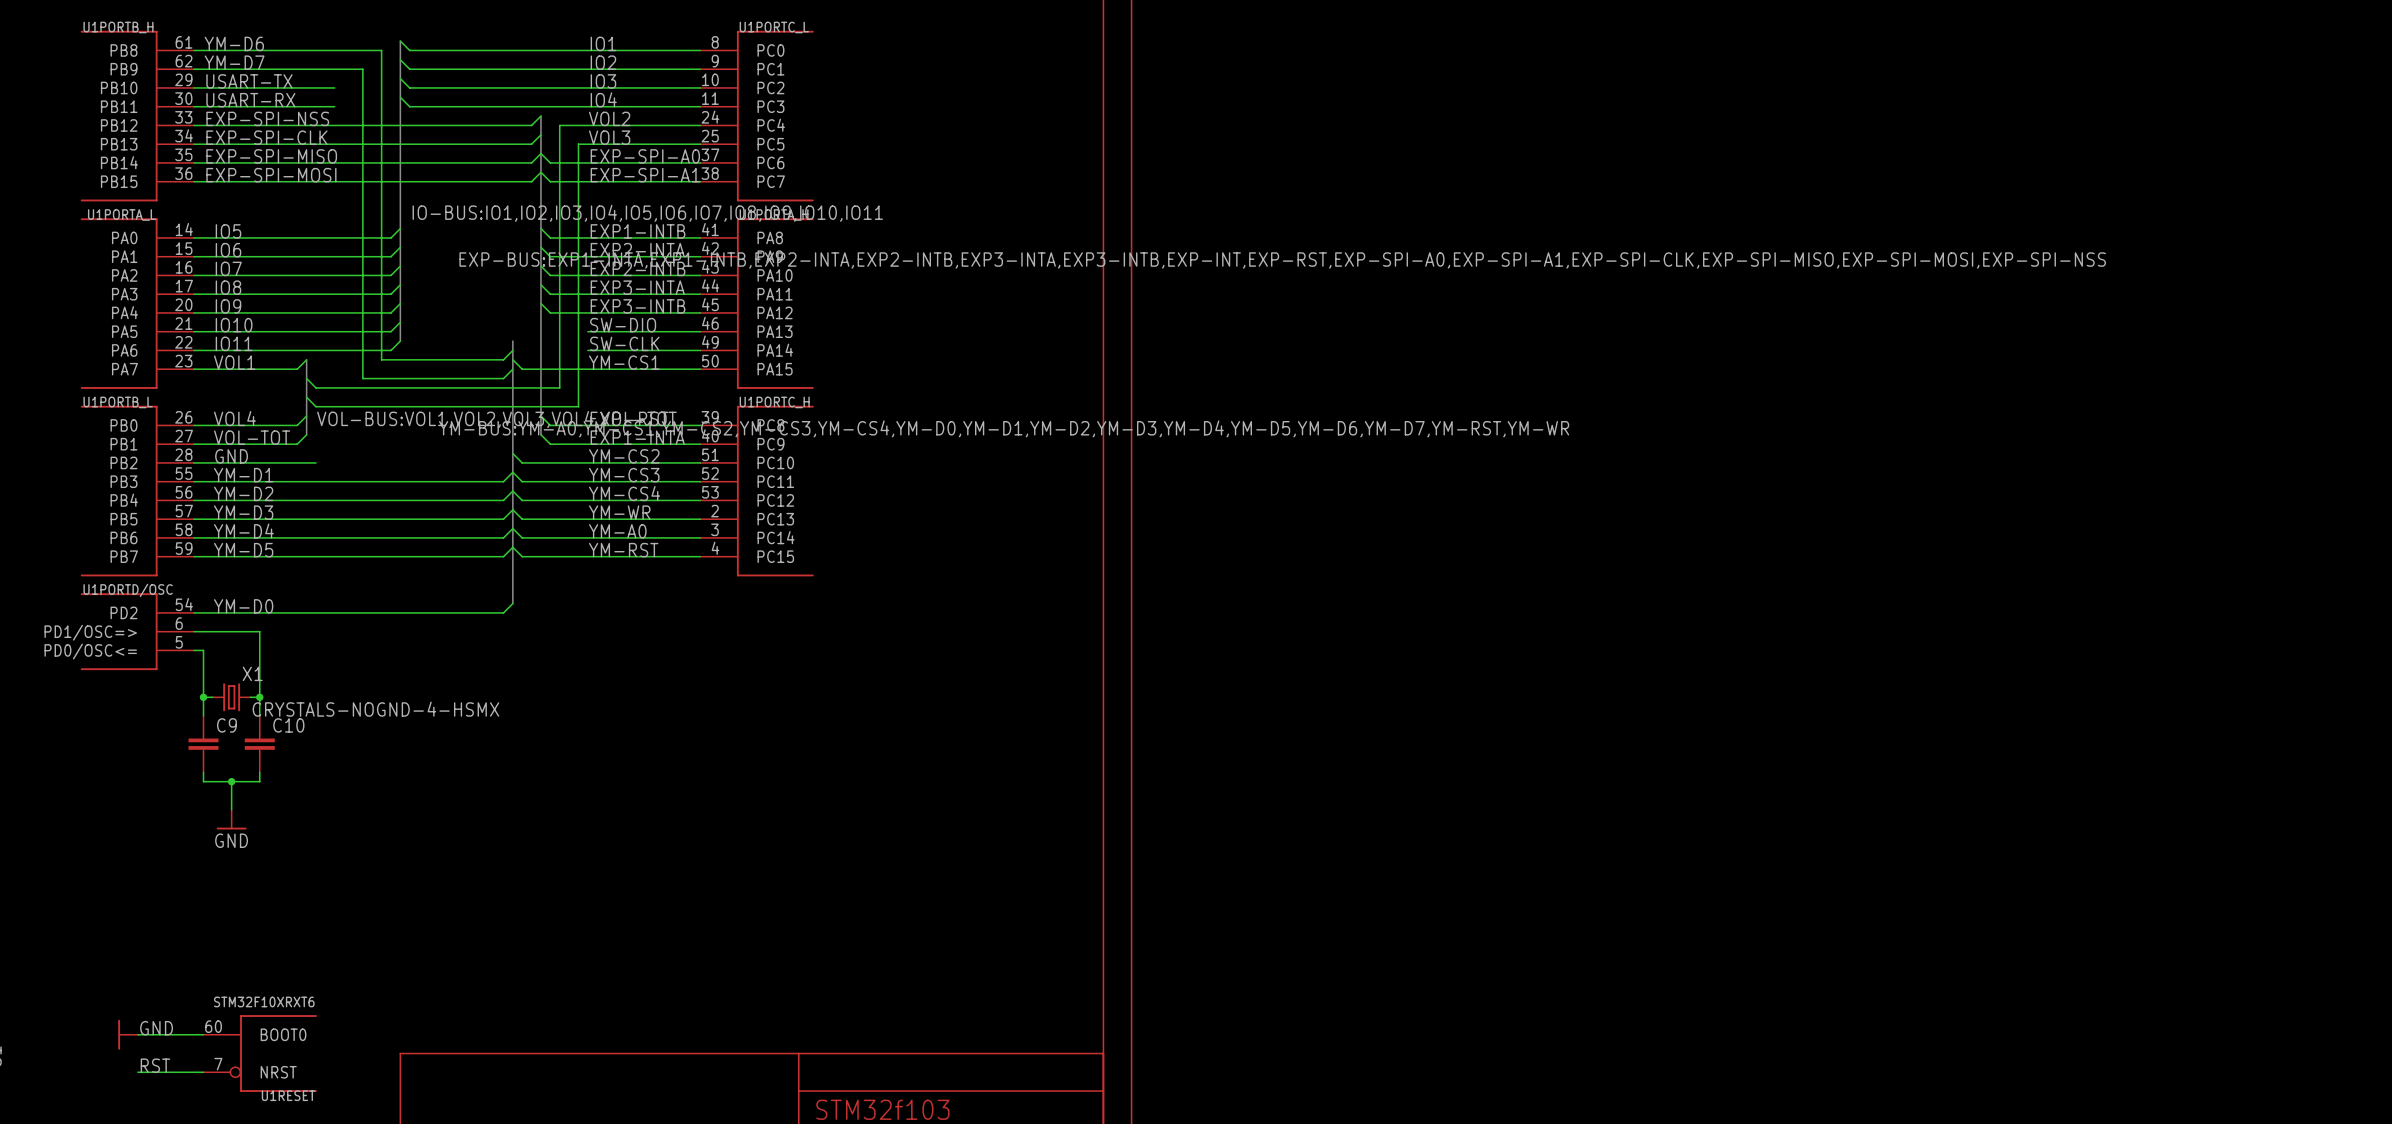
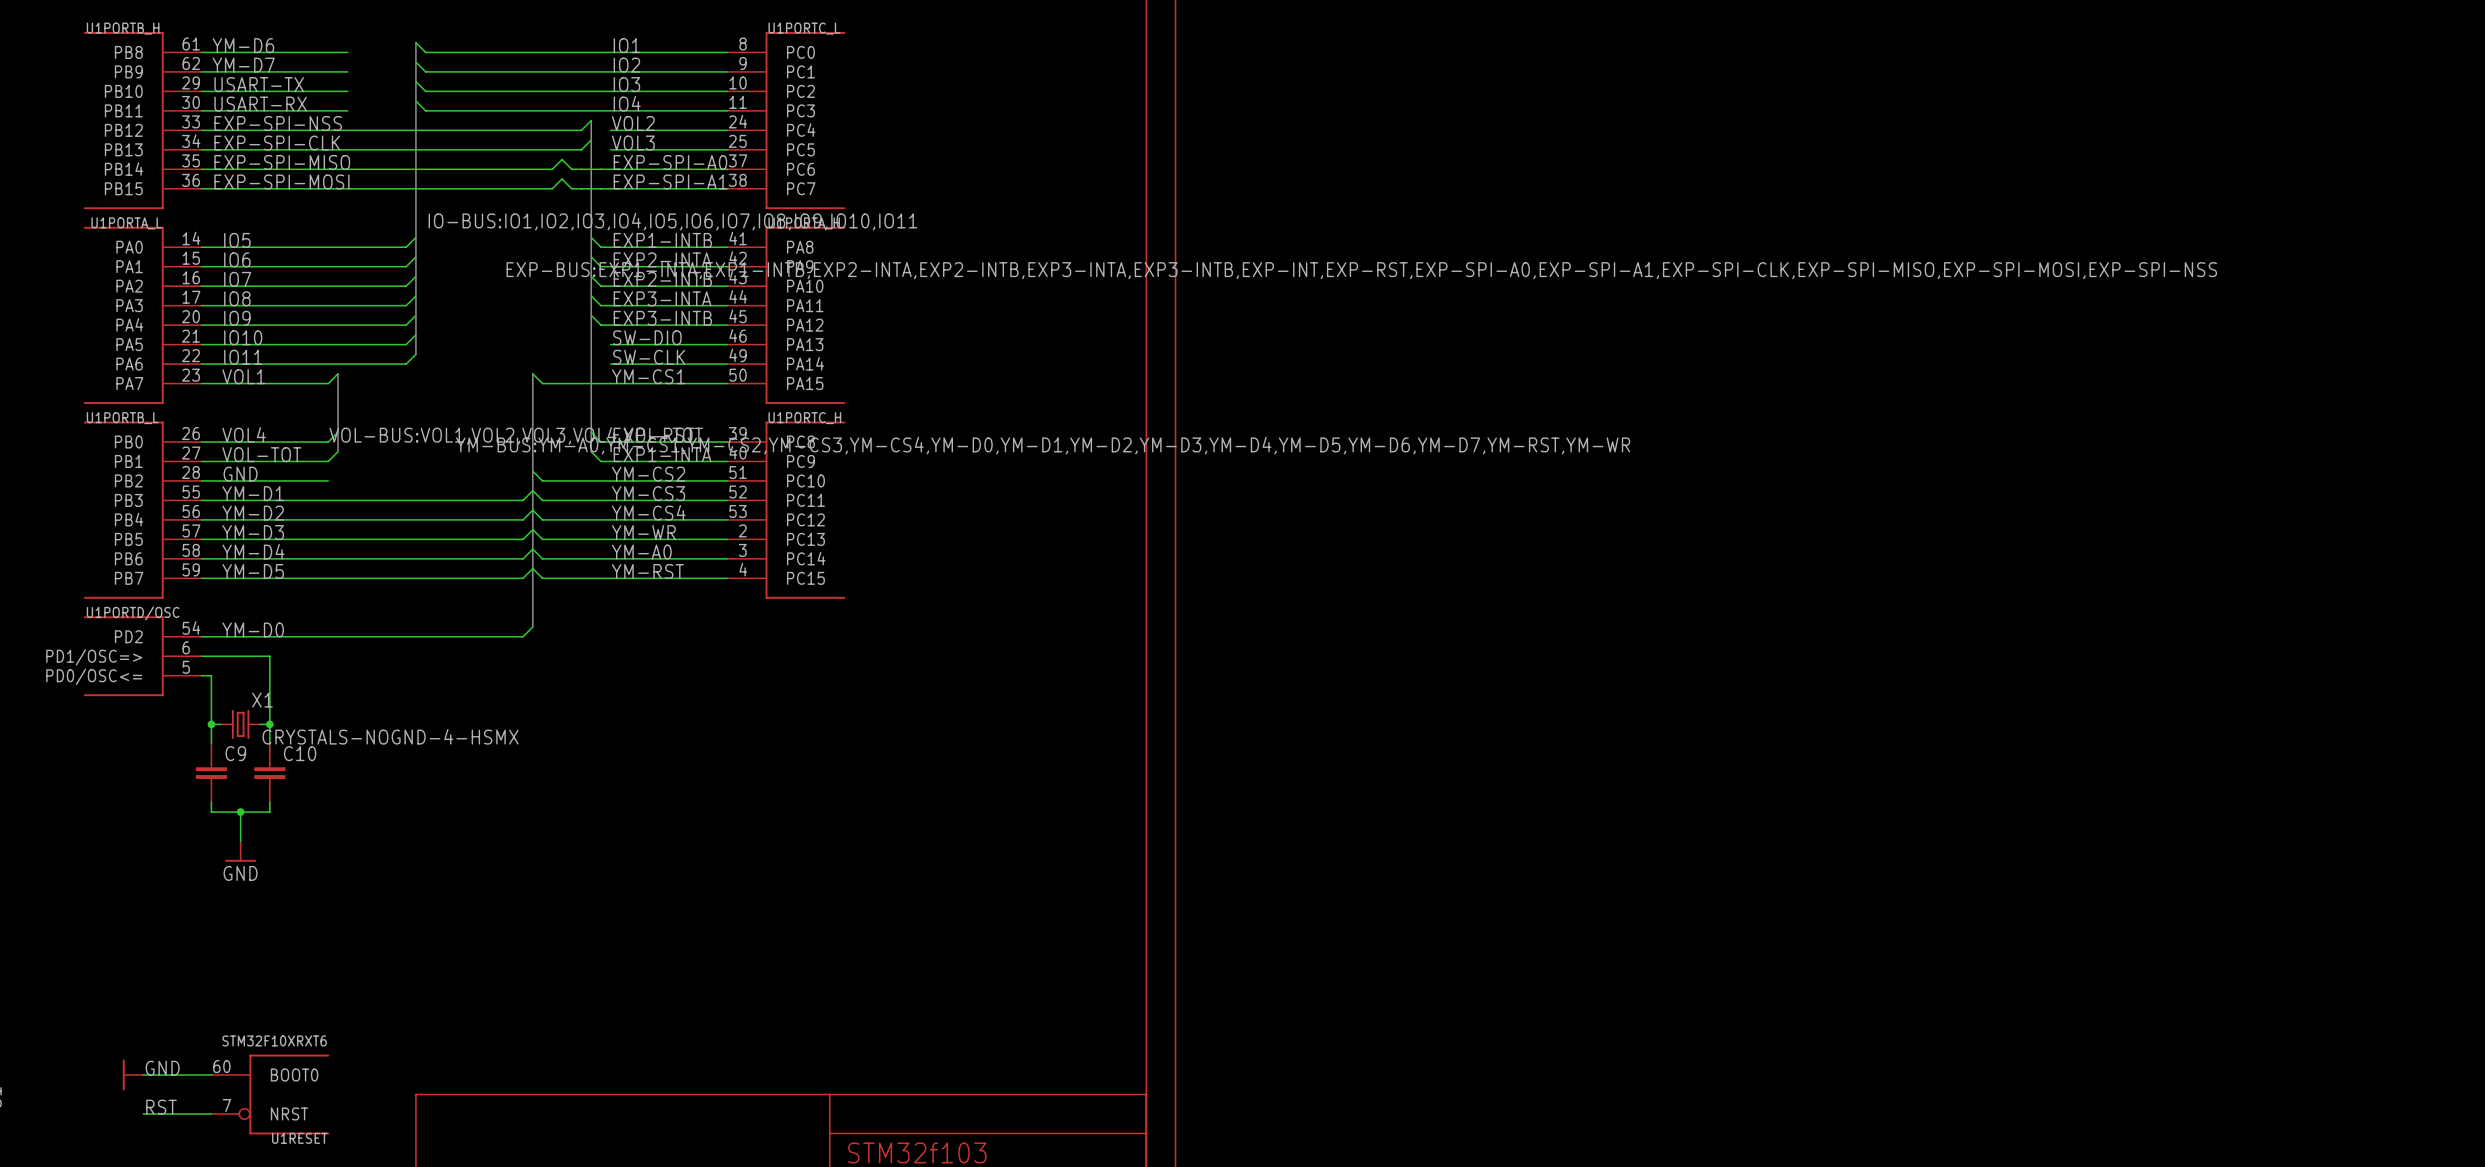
wire: (334, 50) (381, 50) (381, 359) (503, 359) (512, 350) -> none
wire: (334, 69) (362, 69) (362, 378) (503, 378) (512, 369) -> none
bus: (540, 116) (540, 434) -> (591, 120) (591, 451)
wire: (540, 116) (531, 125) -> (591, 120) (581, 130) (552, 130)
wire: (587, 125) (559, 125) (559, 387) (315, 387) (306, 378) -> none
wire: (540, 134) (531, 144) -> (591, 140) (581, 149) (552, 149)
wire: (587, 144) (578, 144) (578, 406) (315, 406) (306, 397) -> none
wire: (540, 228) (550, 237) (578, 237) -> (591, 237) (600, 247)
wire: (540, 247) (550, 256) (578, 256) -> (591, 256) (600, 266)
label position: EXP-BUS:EXP1-INTA,EXP1-INTB,EXP2-INTA,EXP2-INTB,EXP3-INTA,EXP3-INTB,EXP-INT,EXP-RST,EXP-SPI-A0,EXP-SPI-A1,EXP-SPI-CLK,EXP-SPI-MISO,EXP-SPI-MOSI,EXP-SPI-NSS (1282, 260) -> EXP-BUS:EXP1-INTA,EXP1-INTB,EXP2-INTA,EXP2-INTB,EXP3-INTA,EXP3-INTB,EXP-INT,EXP-RST,EXP-SPI-A0,EXP-SPI-A1,EXP-SPI-CLK,EXP-SPI-MISO,EXP-SPI-MOSI,EXP-SPI-NSS (1361, 270)
wire: (540, 266) (550, 275) (578, 275) -> (591, 276) (600, 286)
wire: (540, 284) (550, 294) (578, 294) -> (591, 295) (600, 305)
wire: (540, 303) (550, 312) (578, 312) -> (591, 315) (600, 325)
bus: (512, 341) (512, 359) -> none
bus: (306, 359) (306, 434) -> (338, 373) (338, 451)
wire: (306, 359) (297, 369) -> (338, 373) (328, 383) (308, 383)
wire: (306, 416) (297, 425) -> (338, 432) (328, 442) (308, 442)
wire: (540, 416) (550, 425) (578, 425) -> (591, 432) (600, 442)
wire: (306, 434) (297, 444) -> (338, 451) (328, 461) (308, 461)
wire: (540, 434) (550, 444) (578, 444) -> (591, 451) (600, 461)

